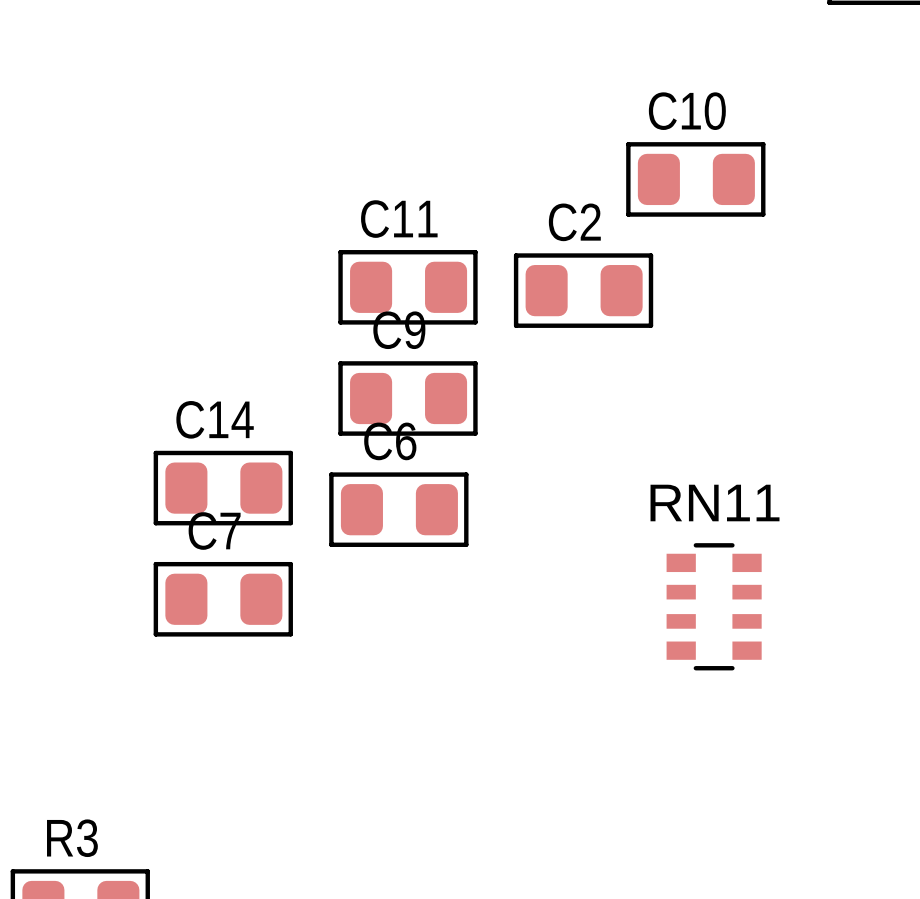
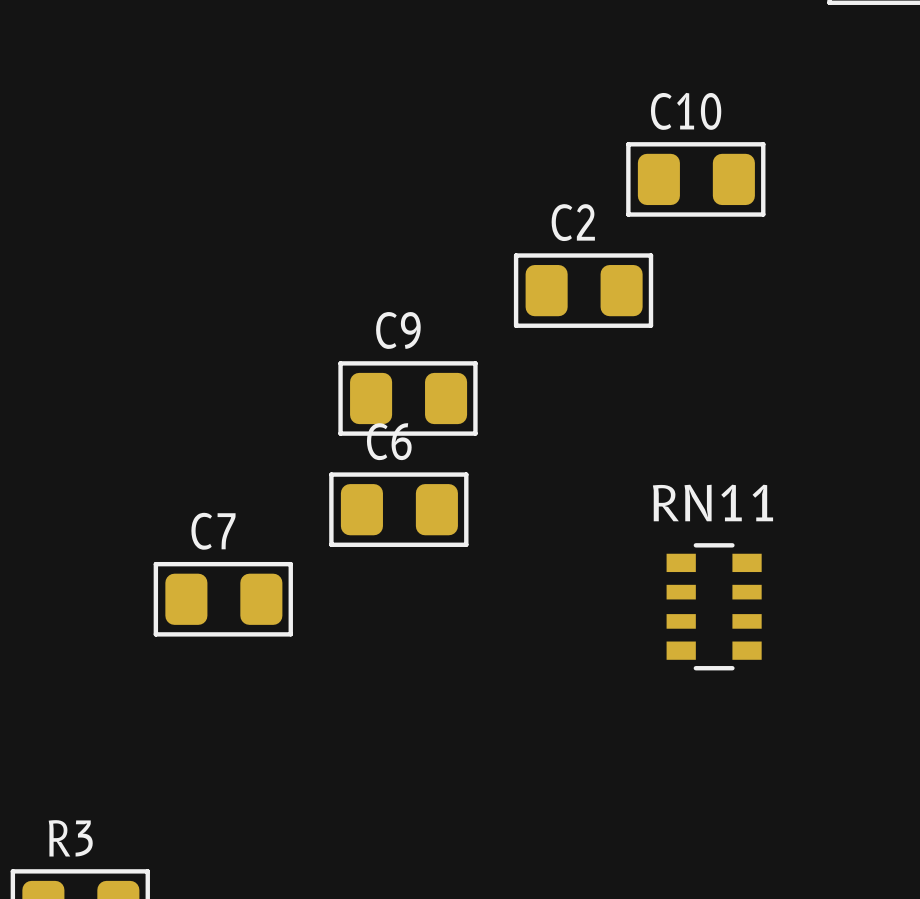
C11: (407, 287) -> none
C14: (223, 488) -> none

